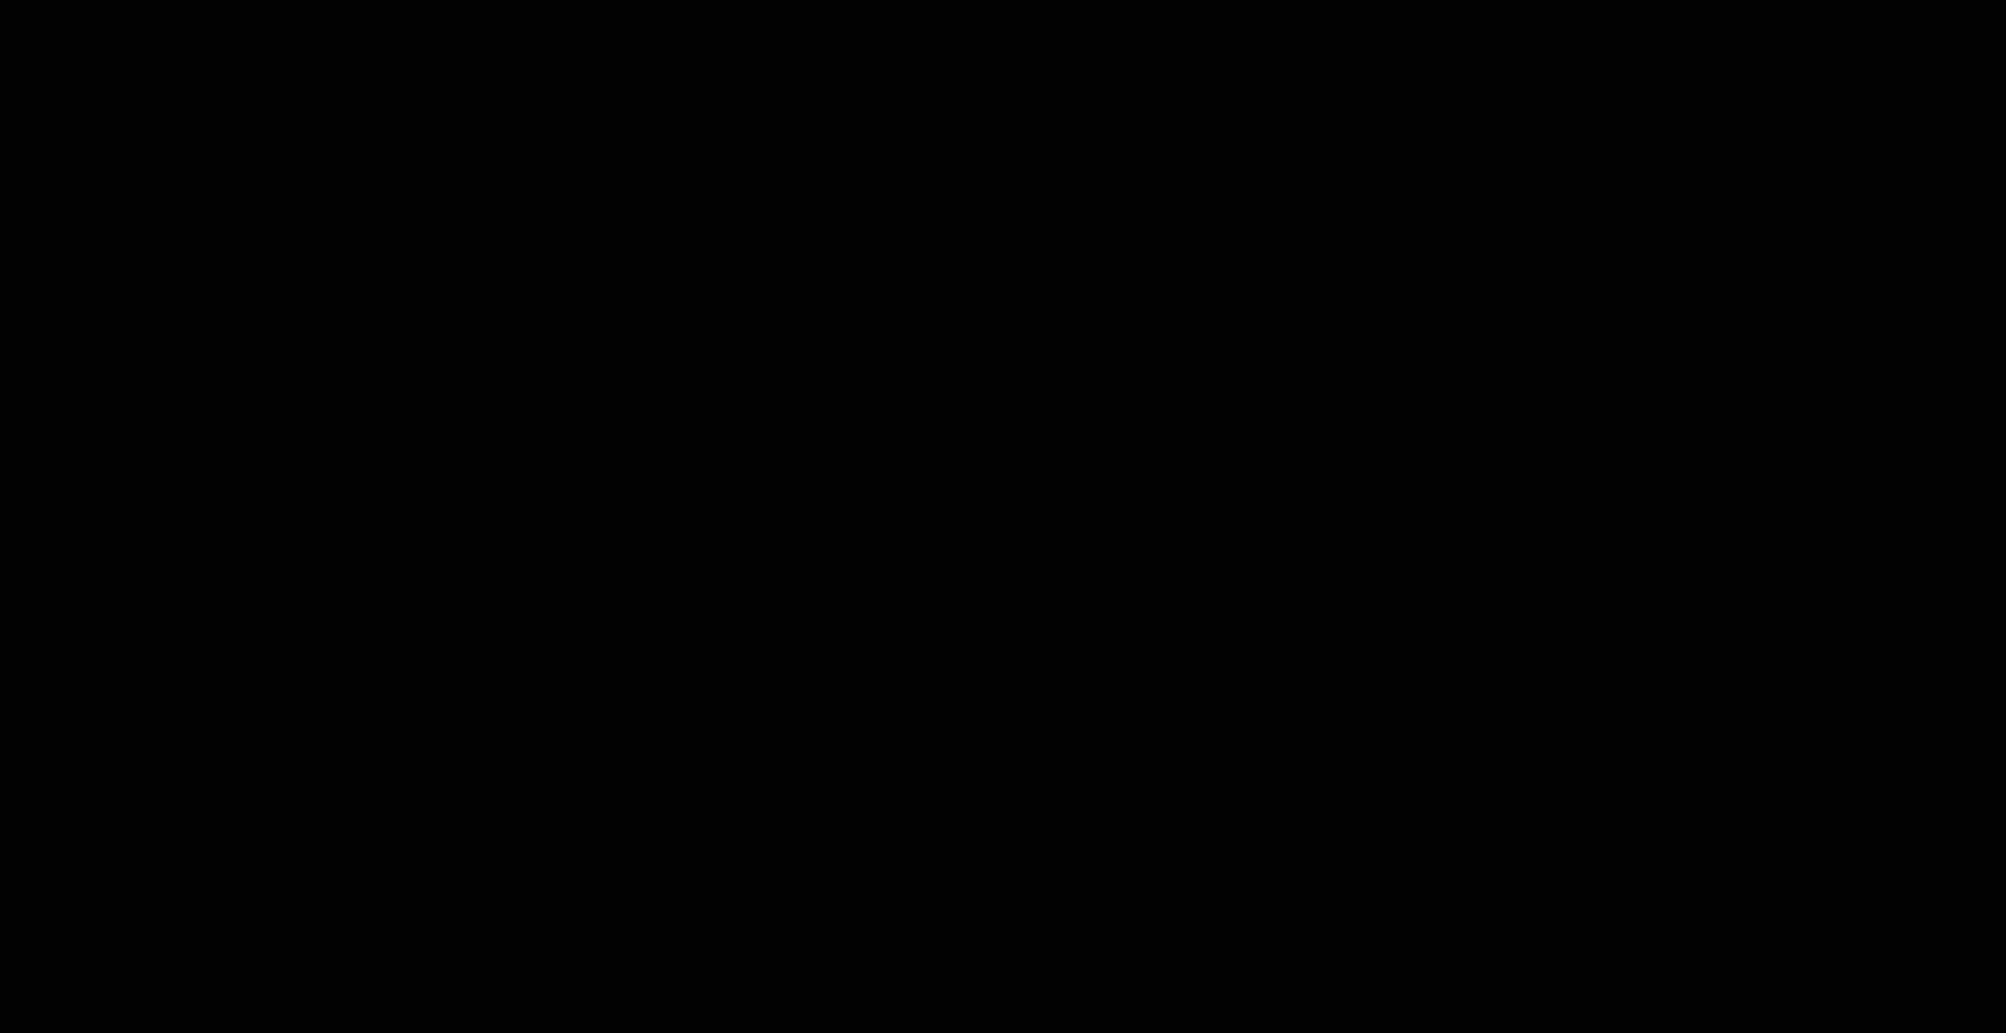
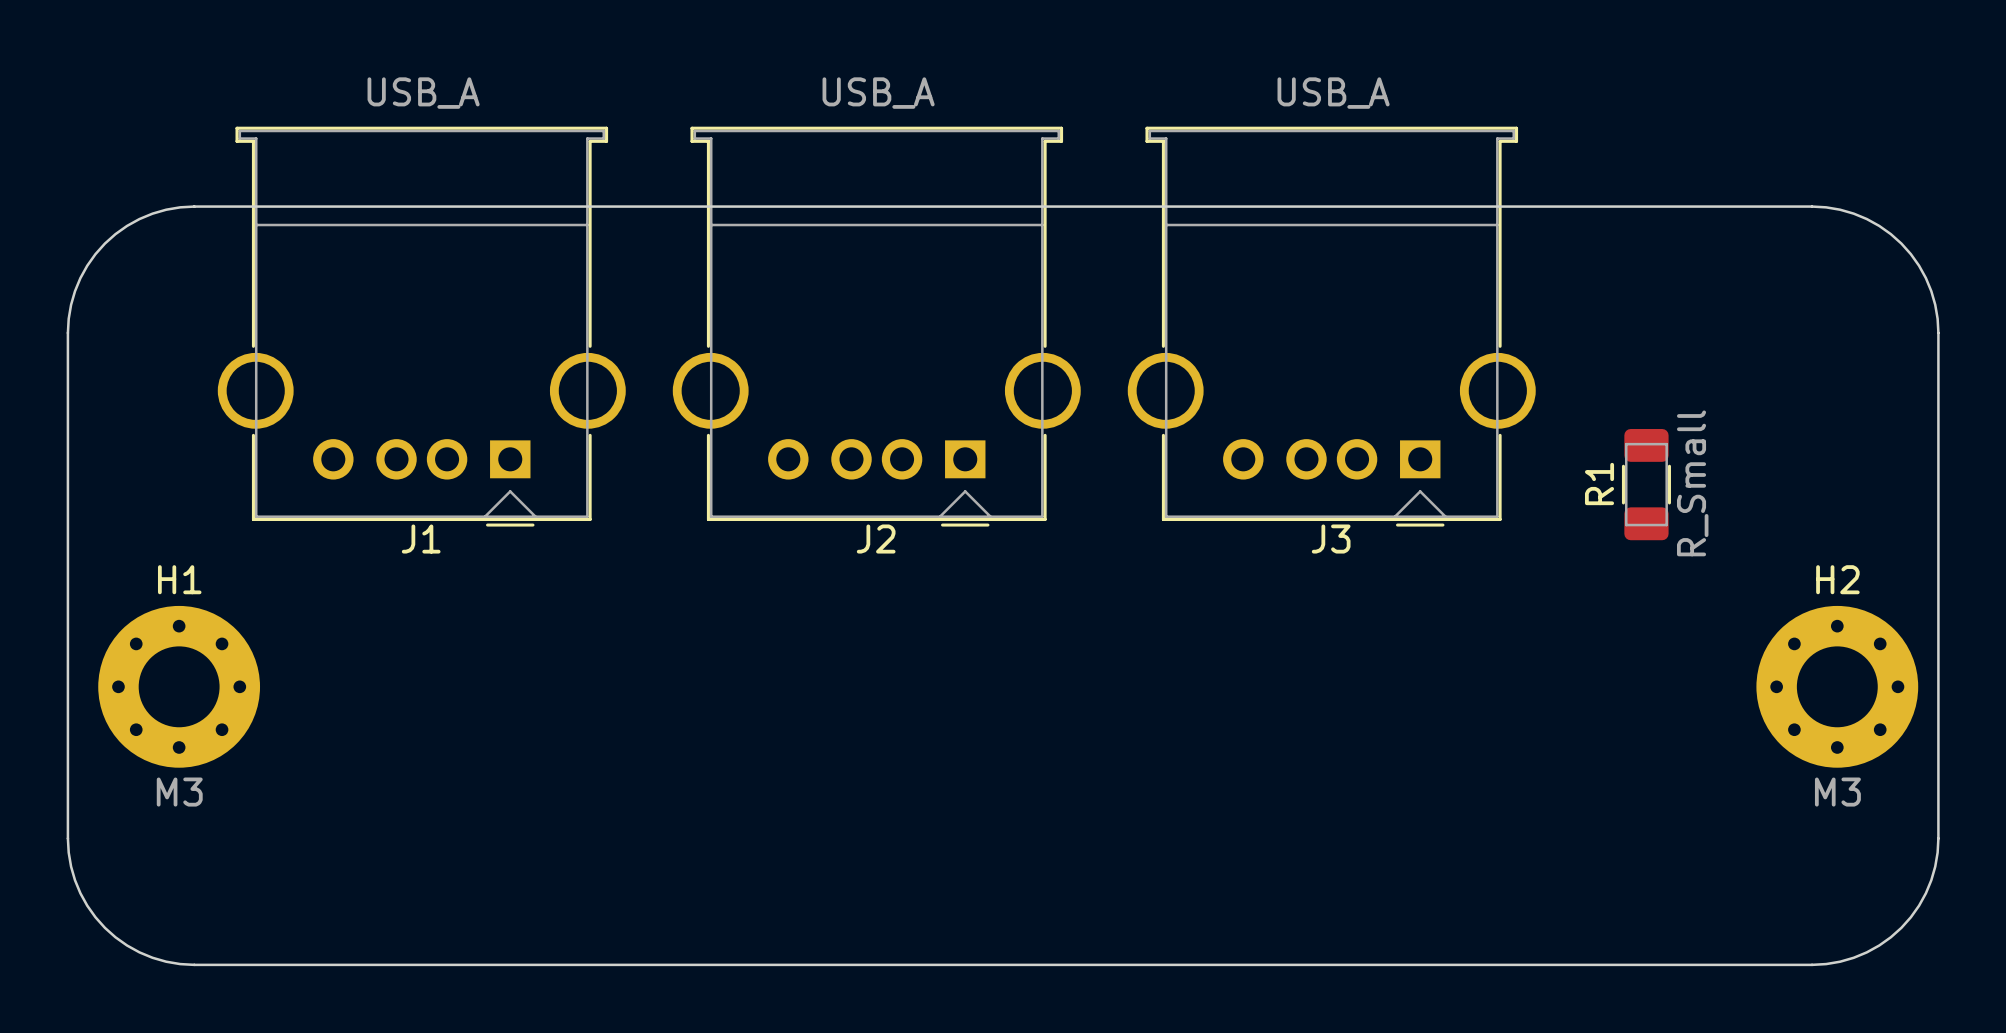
board edge: none -> (194, 206) (1812, 206) (1826, 207) (1853, 213) (1866, 219) (1890, 234) (1910, 254) (1919, 265) (1931, 291) (1937, 318) (1938, 838) (1935, 866) (1931, 880) (1925, 893) (1910, 917) (1890, 937) (1879, 945) (1853, 957) (1840, 961) (1812, 964) (194, 964) (180, 964) (152, 957) (127, 945) (115, 937) (95, 917) (80, 893) (75, 880) (68, 852) (67, 332) (71, 304) (75, 291) (87, 265) (104, 243) (127, 225) (152, 213) (180, 207) (194, 206)
J1: none -> USB_A (421, 326)
J2: none -> USB_A (876, 326)
J3: none -> USB_A (1331, 326)
R1: none -> R_Small (1646, 484)
H1: none -> M3 (179, 686)
H2: none -> M3 (1837, 686)

